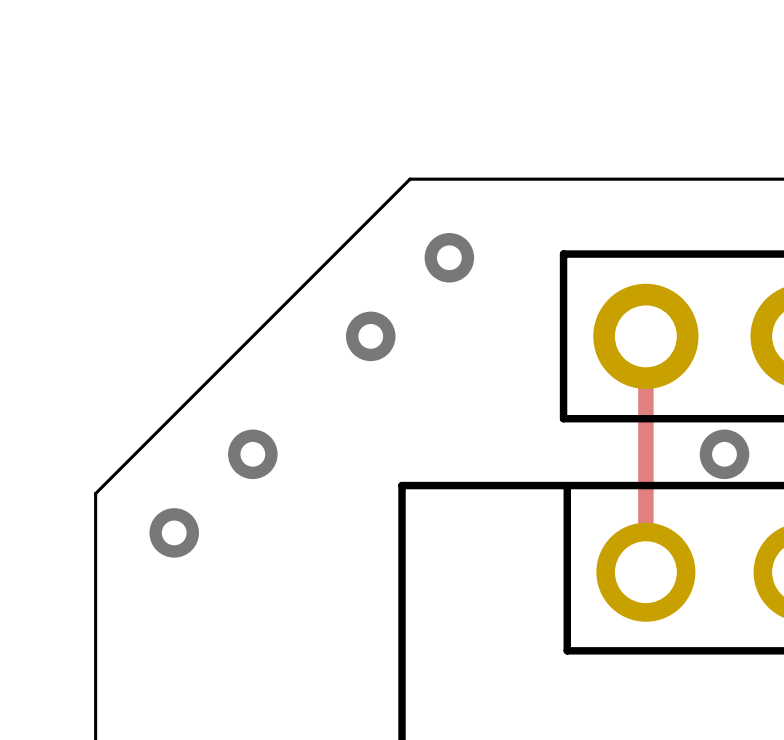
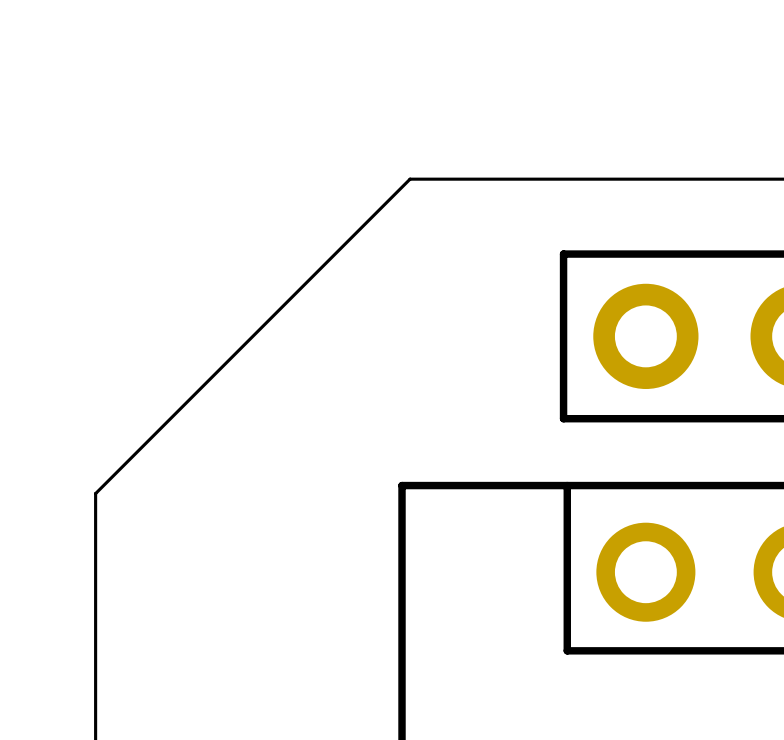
via: (449, 257) -> none
via: (370, 336) -> none
top track: (645, 336) (645, 572) -> none
via: (252, 454) -> none
via: (724, 454) -> none
via: (174, 532) -> none

